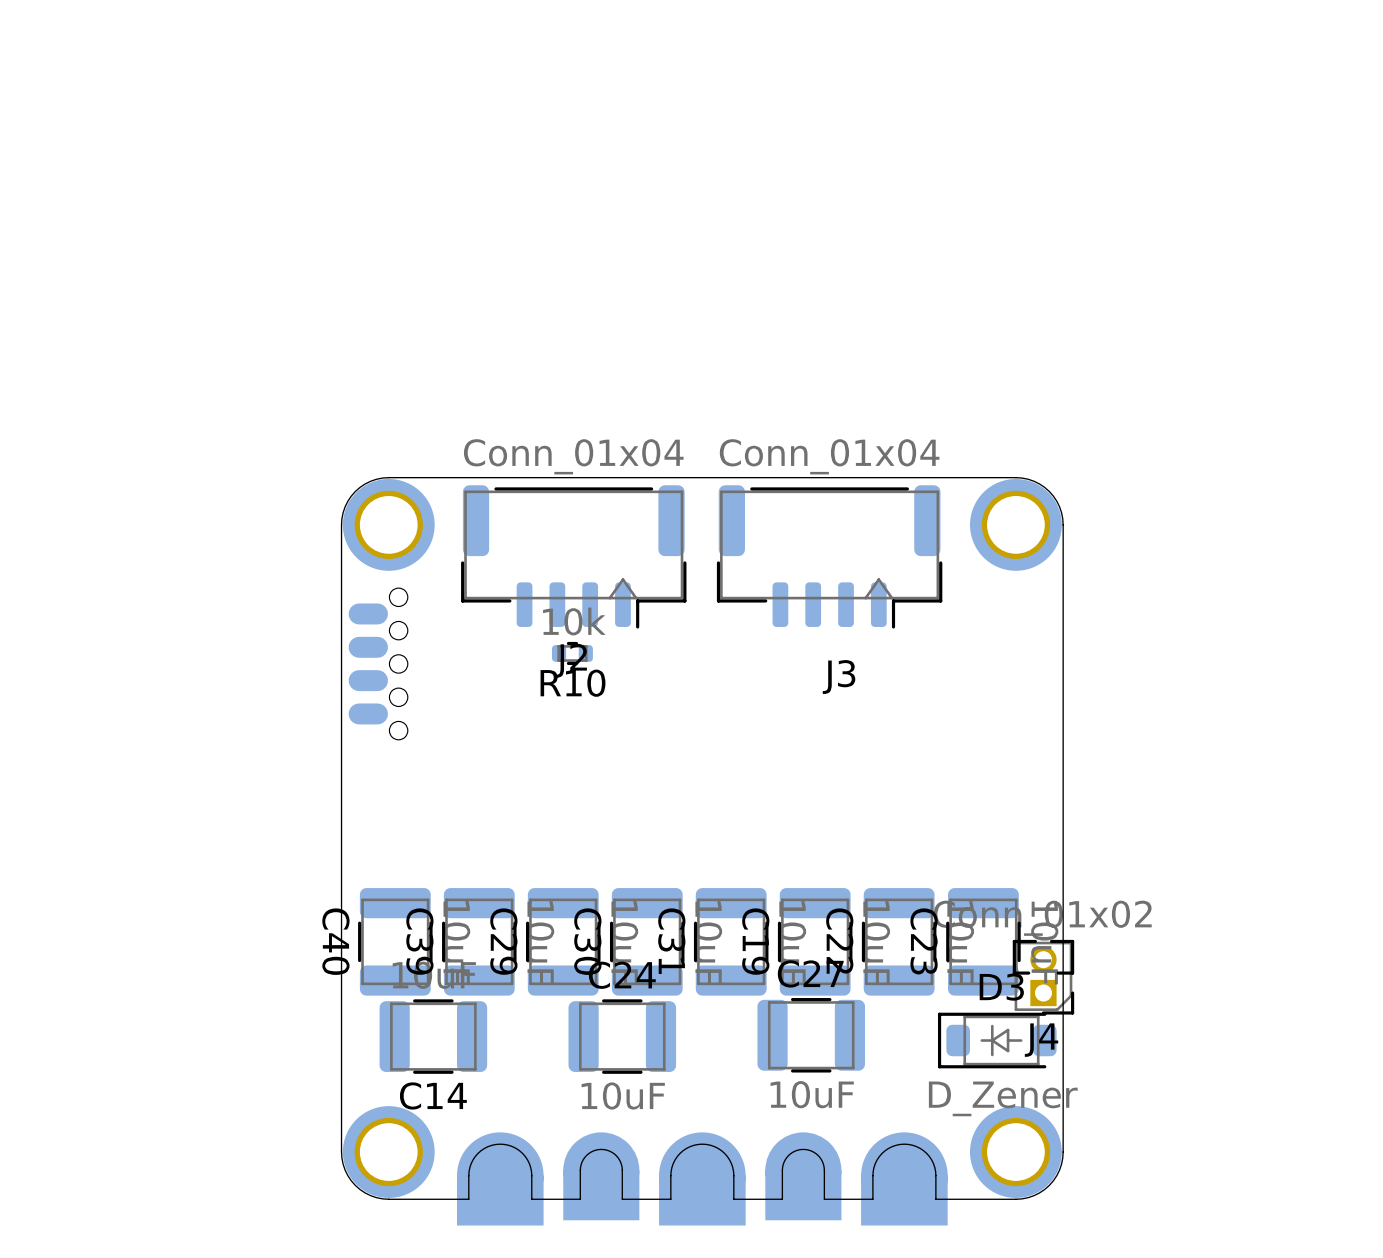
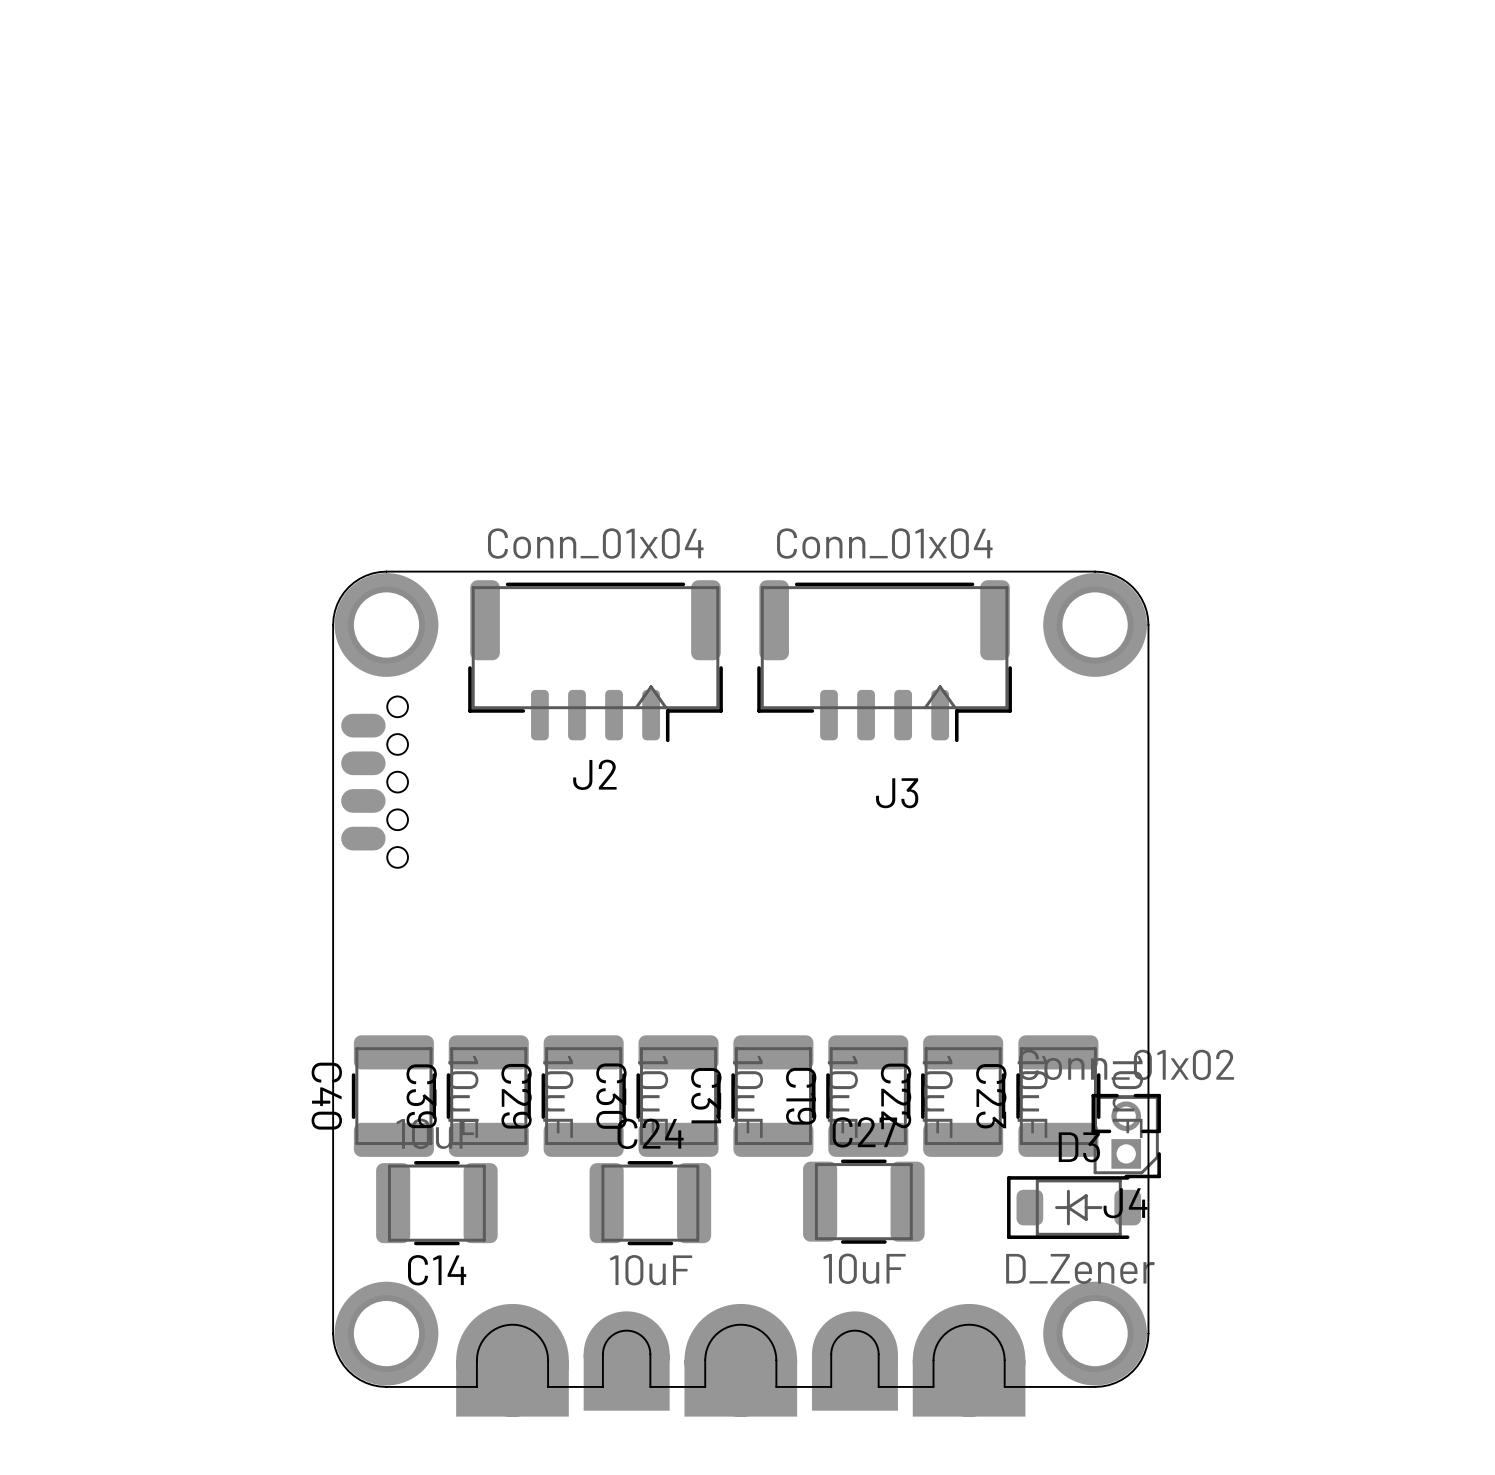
R10: 10k (572, 653) -> none
part footprint: [456, 1132, 544, 1226] -> [456, 1303, 569, 1417]
part footprint: [659, 1132, 746, 1226] -> [684, 1303, 798, 1417]
part footprint: [861, 1132, 948, 1226] -> [912, 1303, 1026, 1417]

